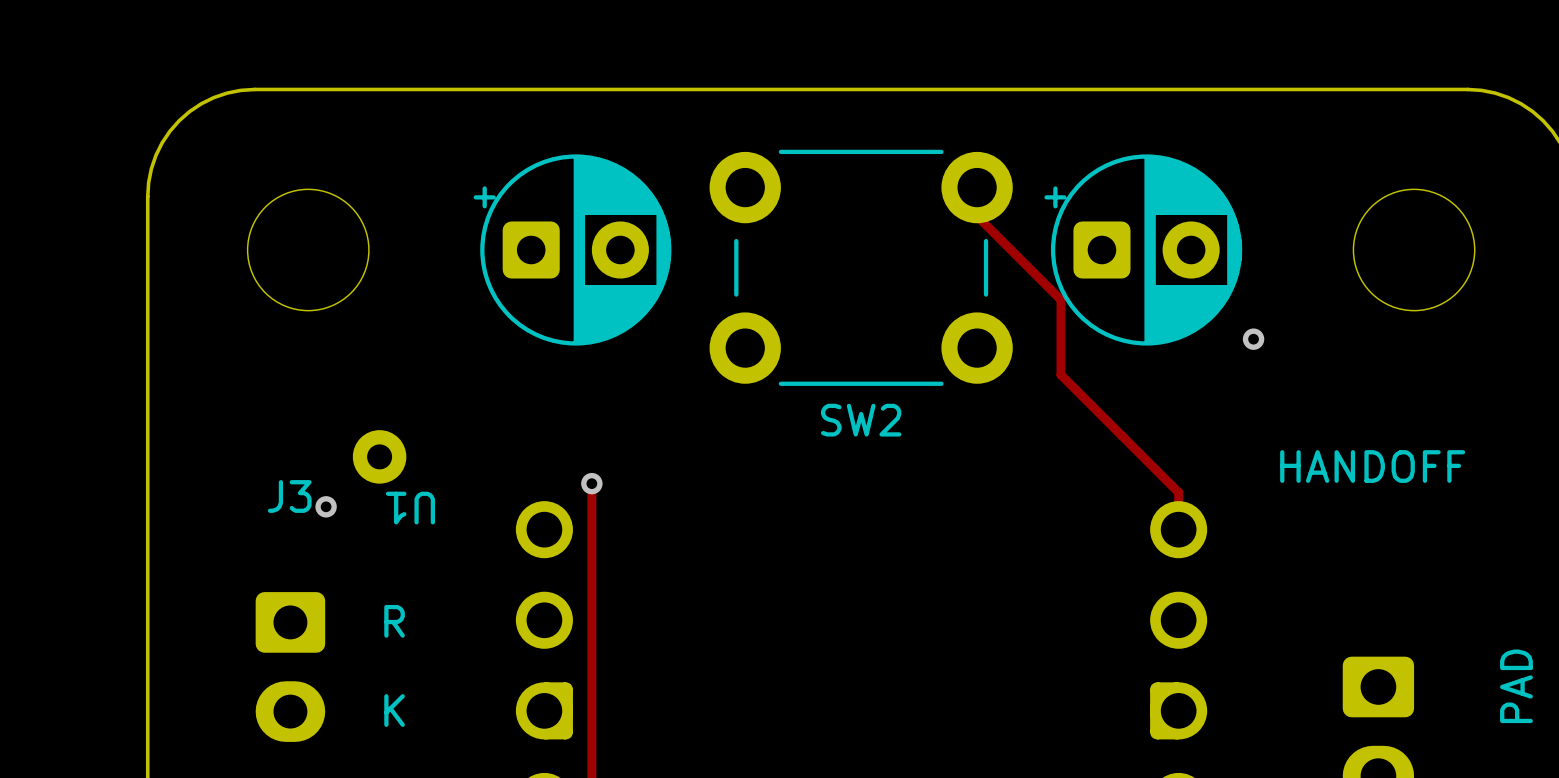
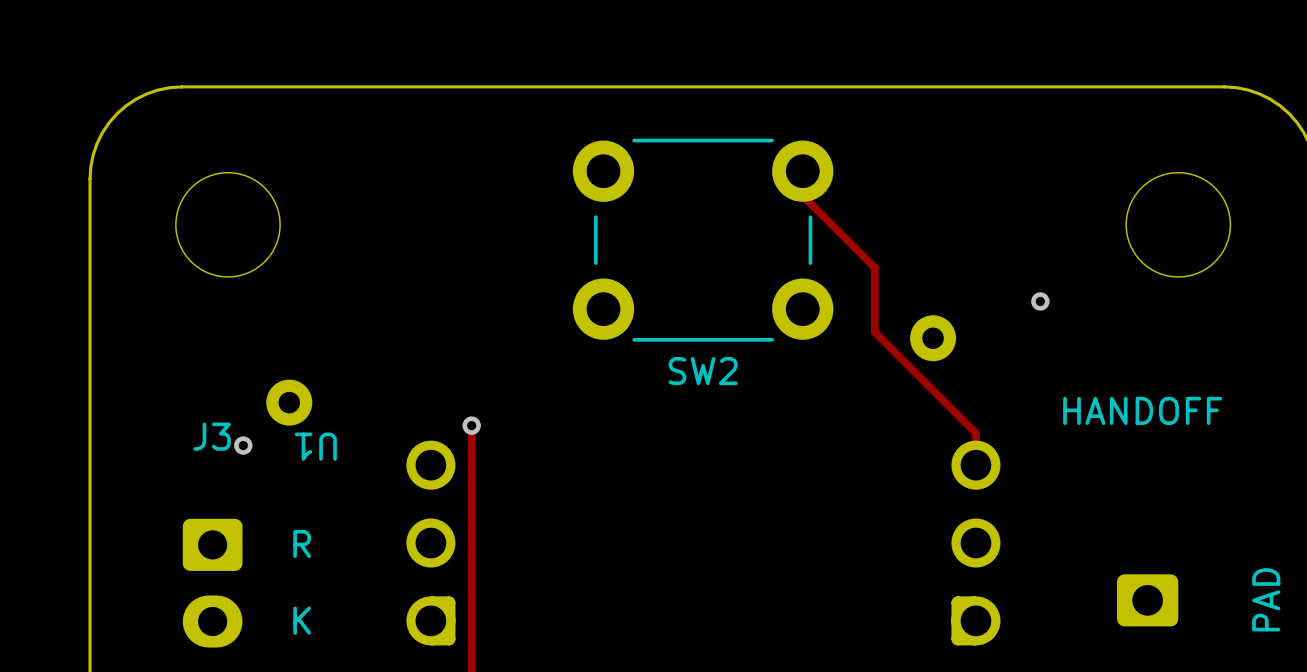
part: (572, 249) -> none
part: (1143, 249) -> none
part: none -> (933, 338)

